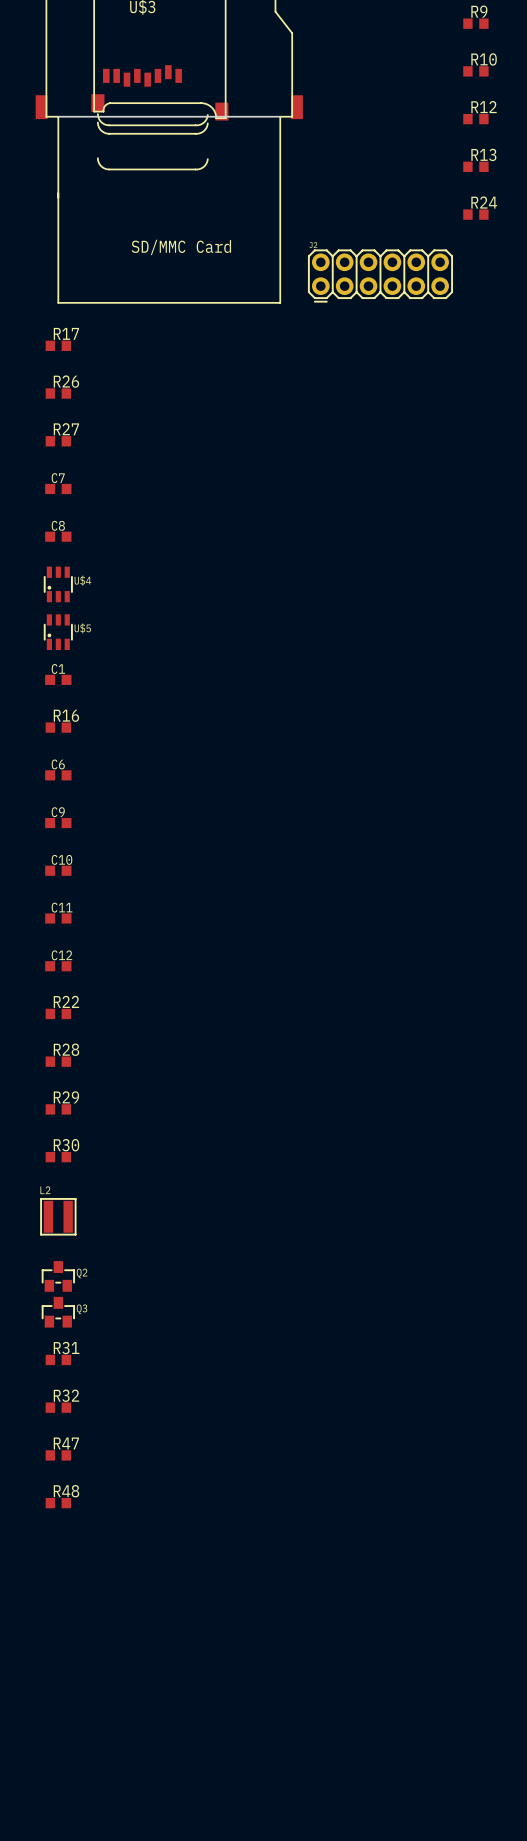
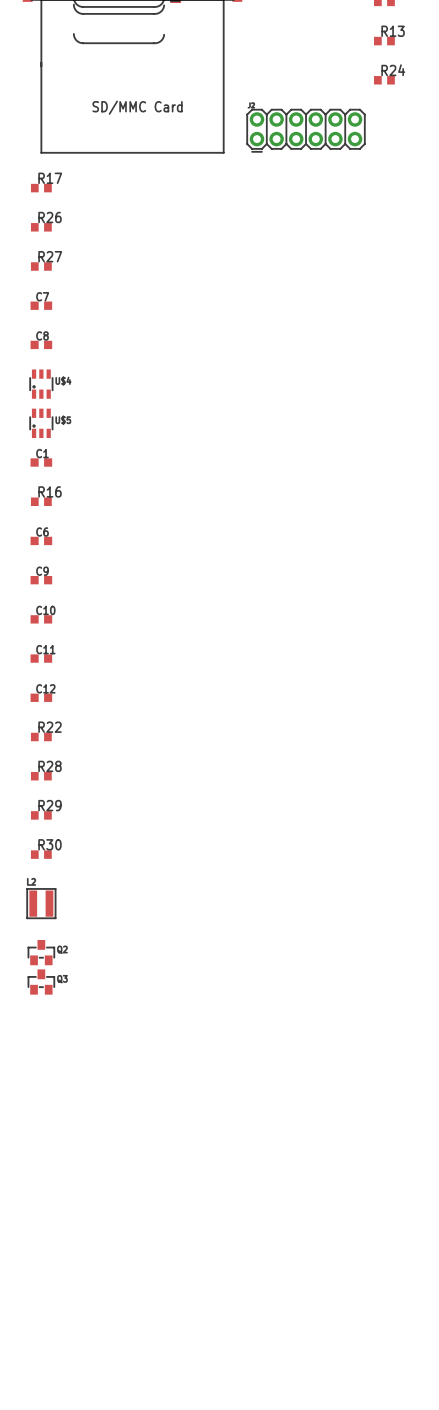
R31: (58, 1359) -> none
R32: (58, 1407) -> none
R47: (58, 1455) -> none
R48: (58, 1503) -> none

